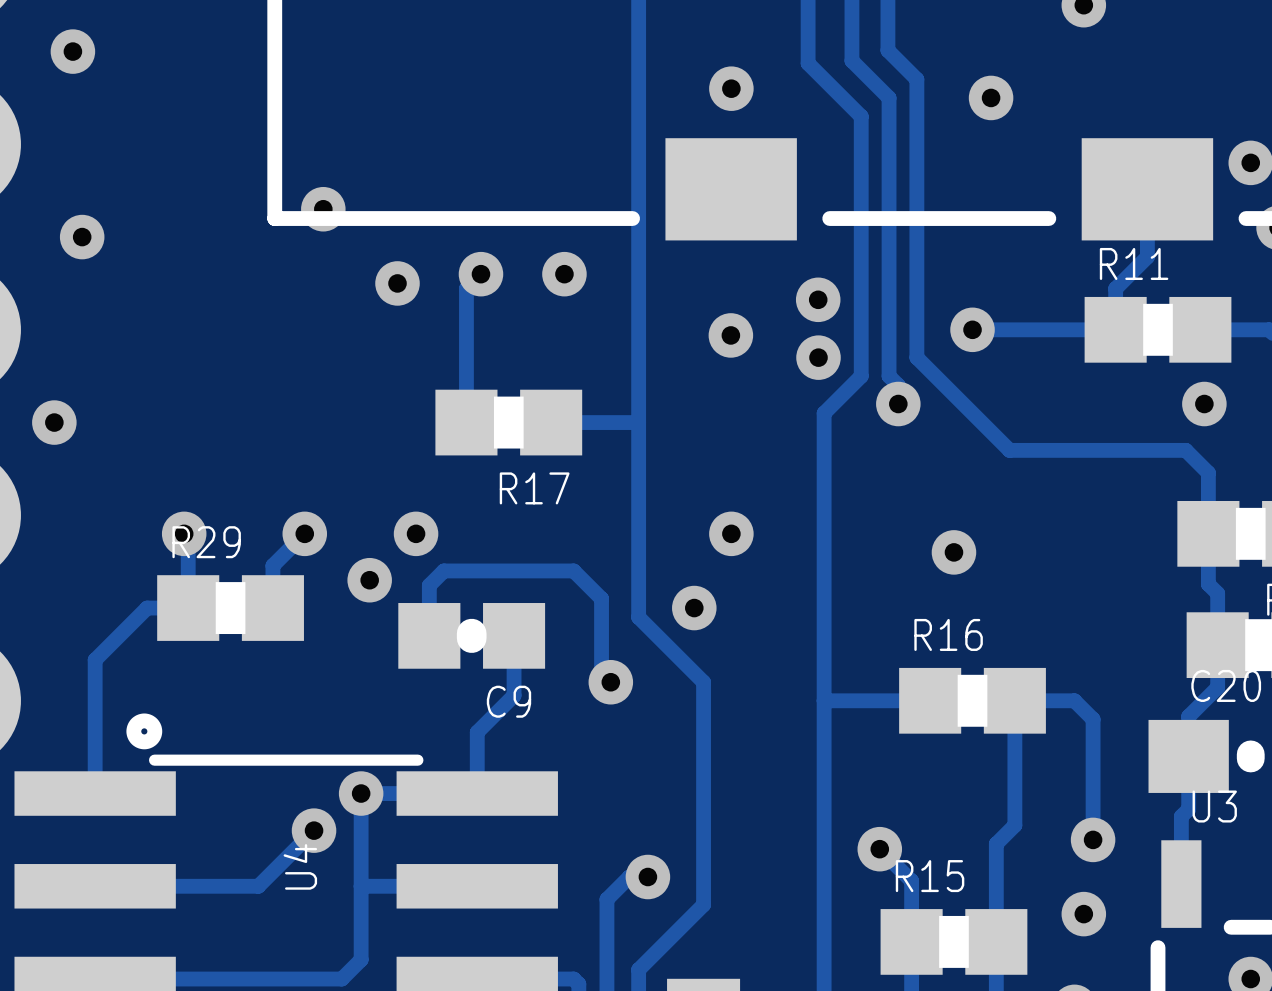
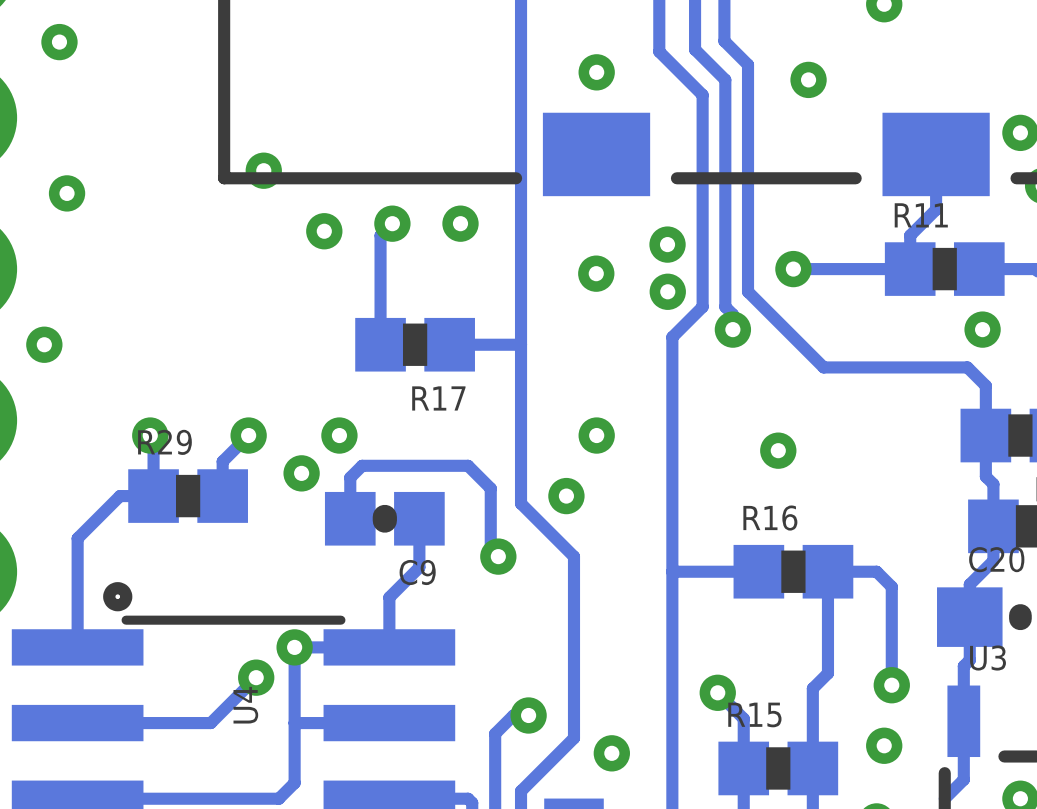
track: none -> (963, 721) (963, 779) (944, 798)
via: none -> (611, 753)

